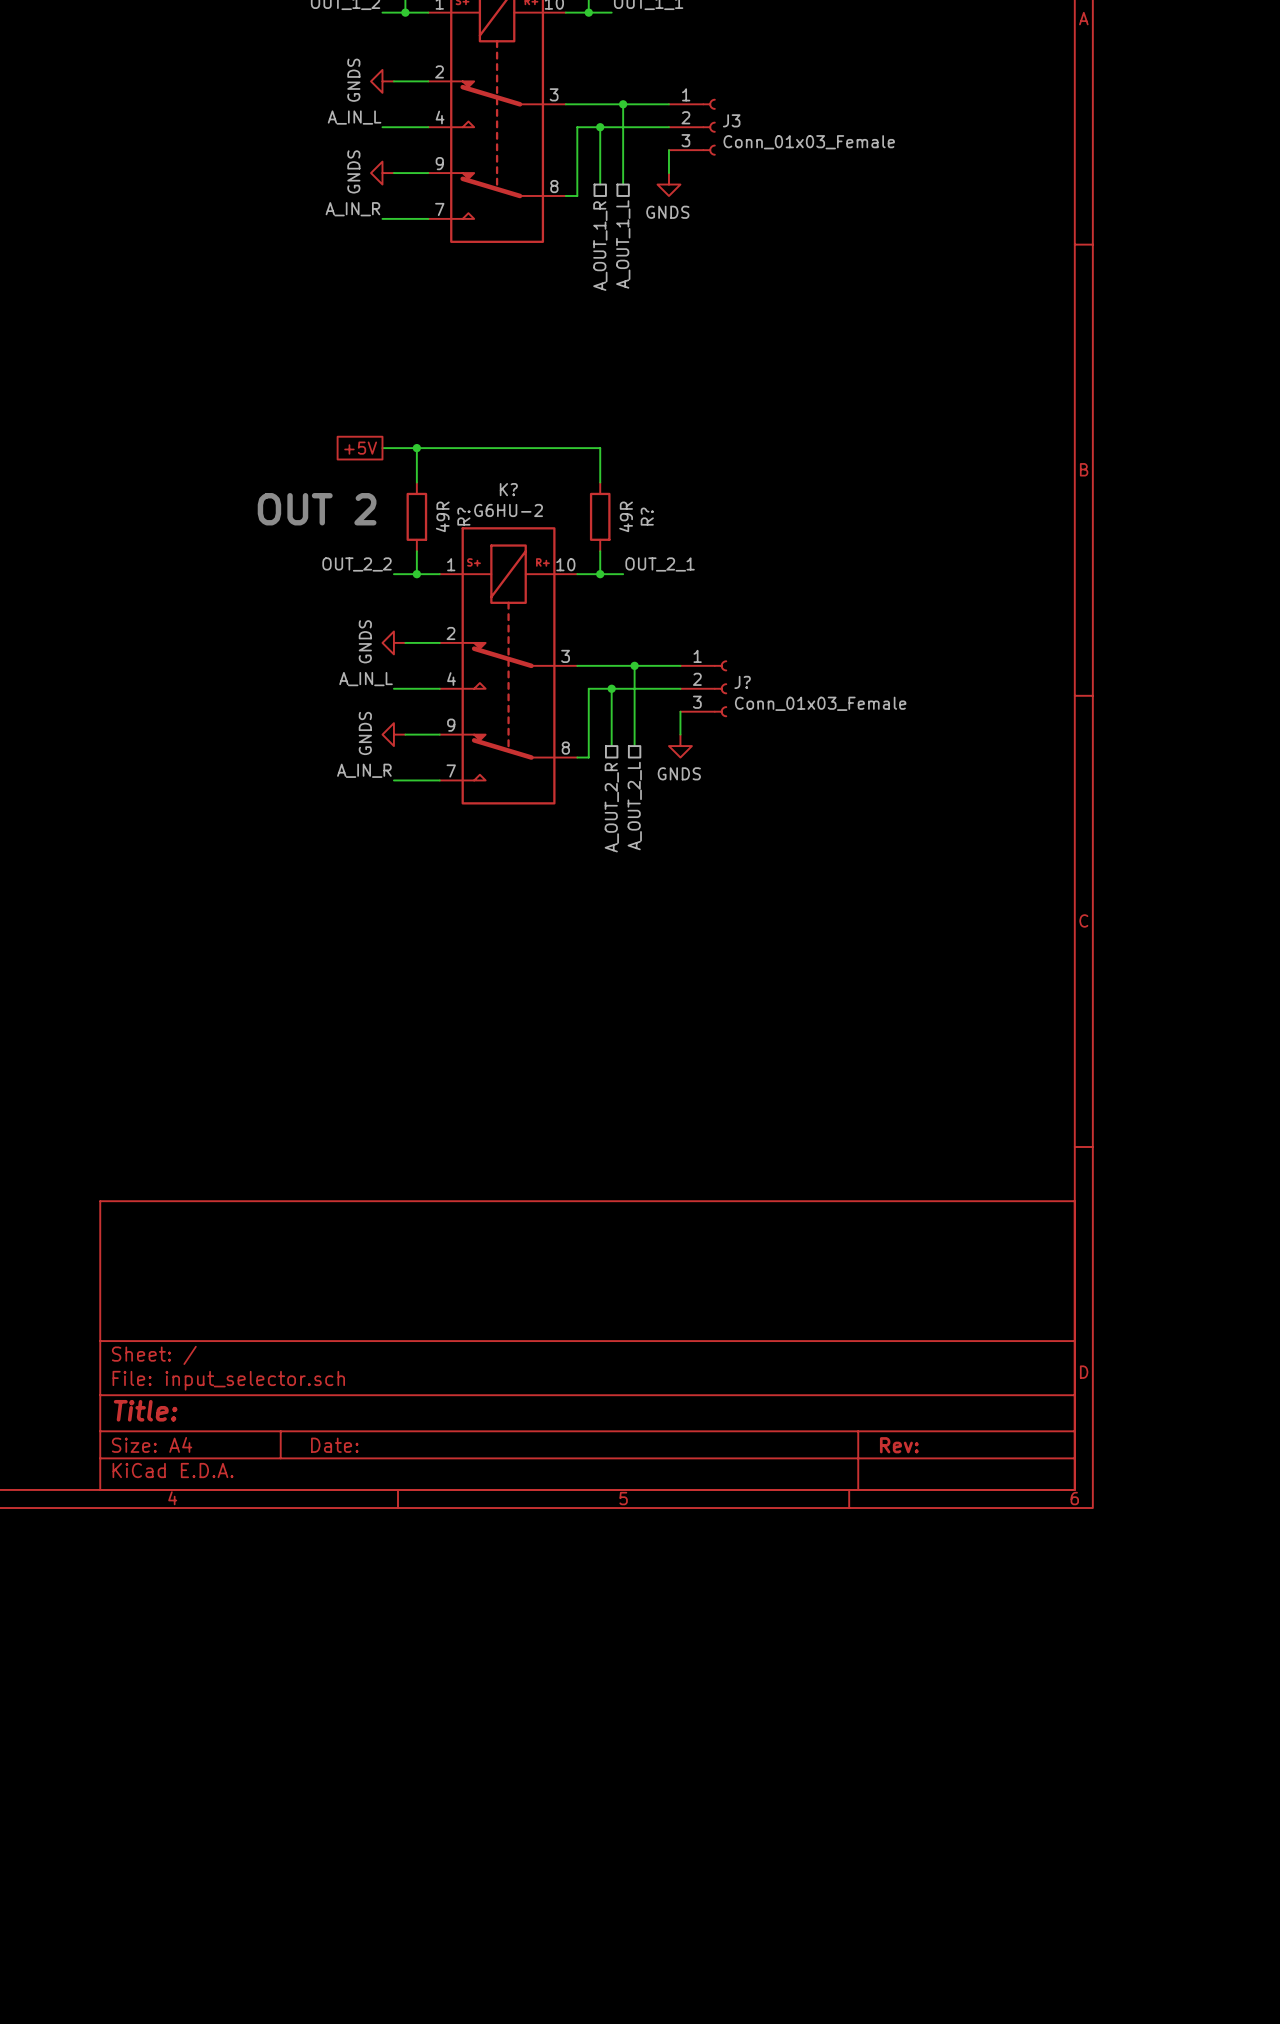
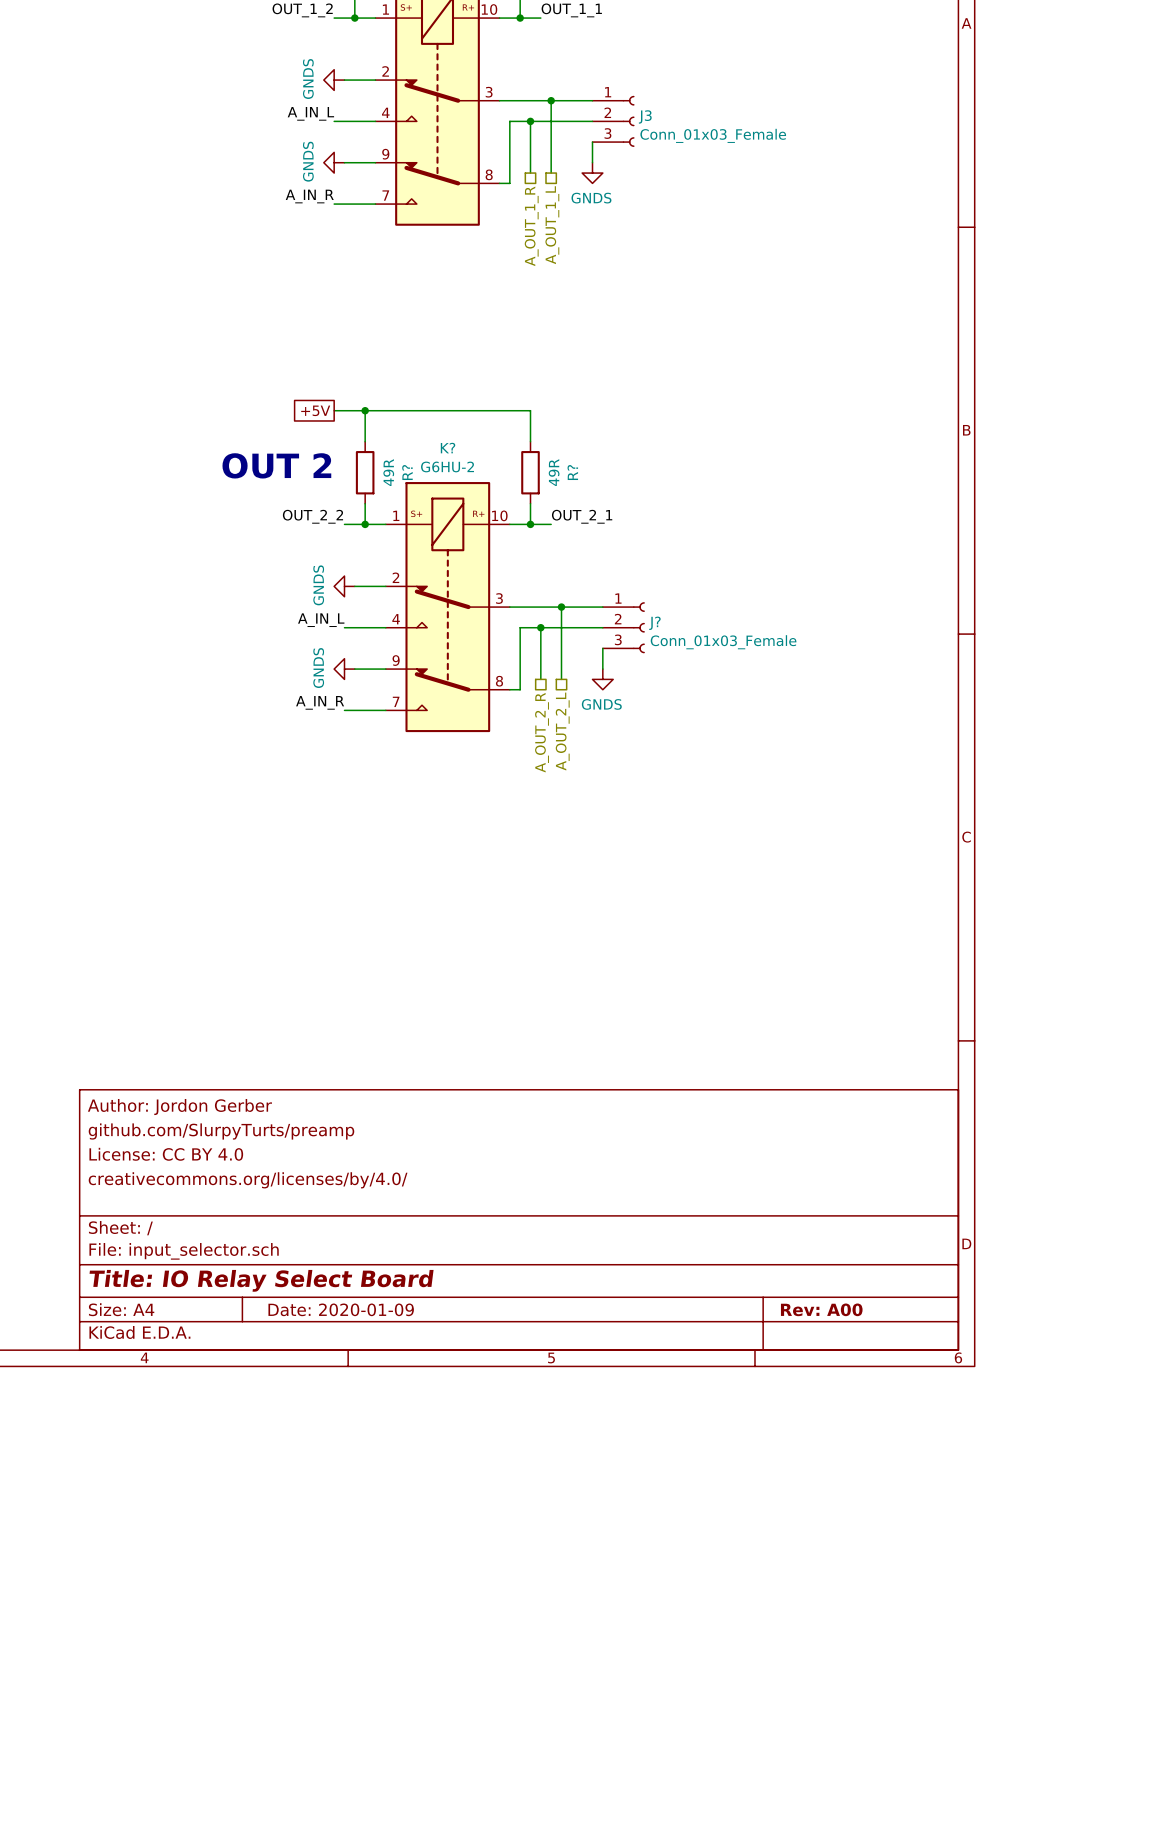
title block: none -> Author: Jordon Gerber (179, 1107)
title block: none -> github.com/SlurpyTurts/preamp (221, 1131)
title block: none -> License: CC BY 4.0 (166, 1154)
title block: none -> creativecommons.org/licenses/by/4.0/ (248, 1180)
title block: Title: (145, 1410) -> Title: IO Relay Select Board (261, 1280)
title block: Date: (334, 1445) -> Date: 2020-01-09 (341, 1309)
title block: Rev: (899, 1445) -> Rev: A00 (821, 1309)

